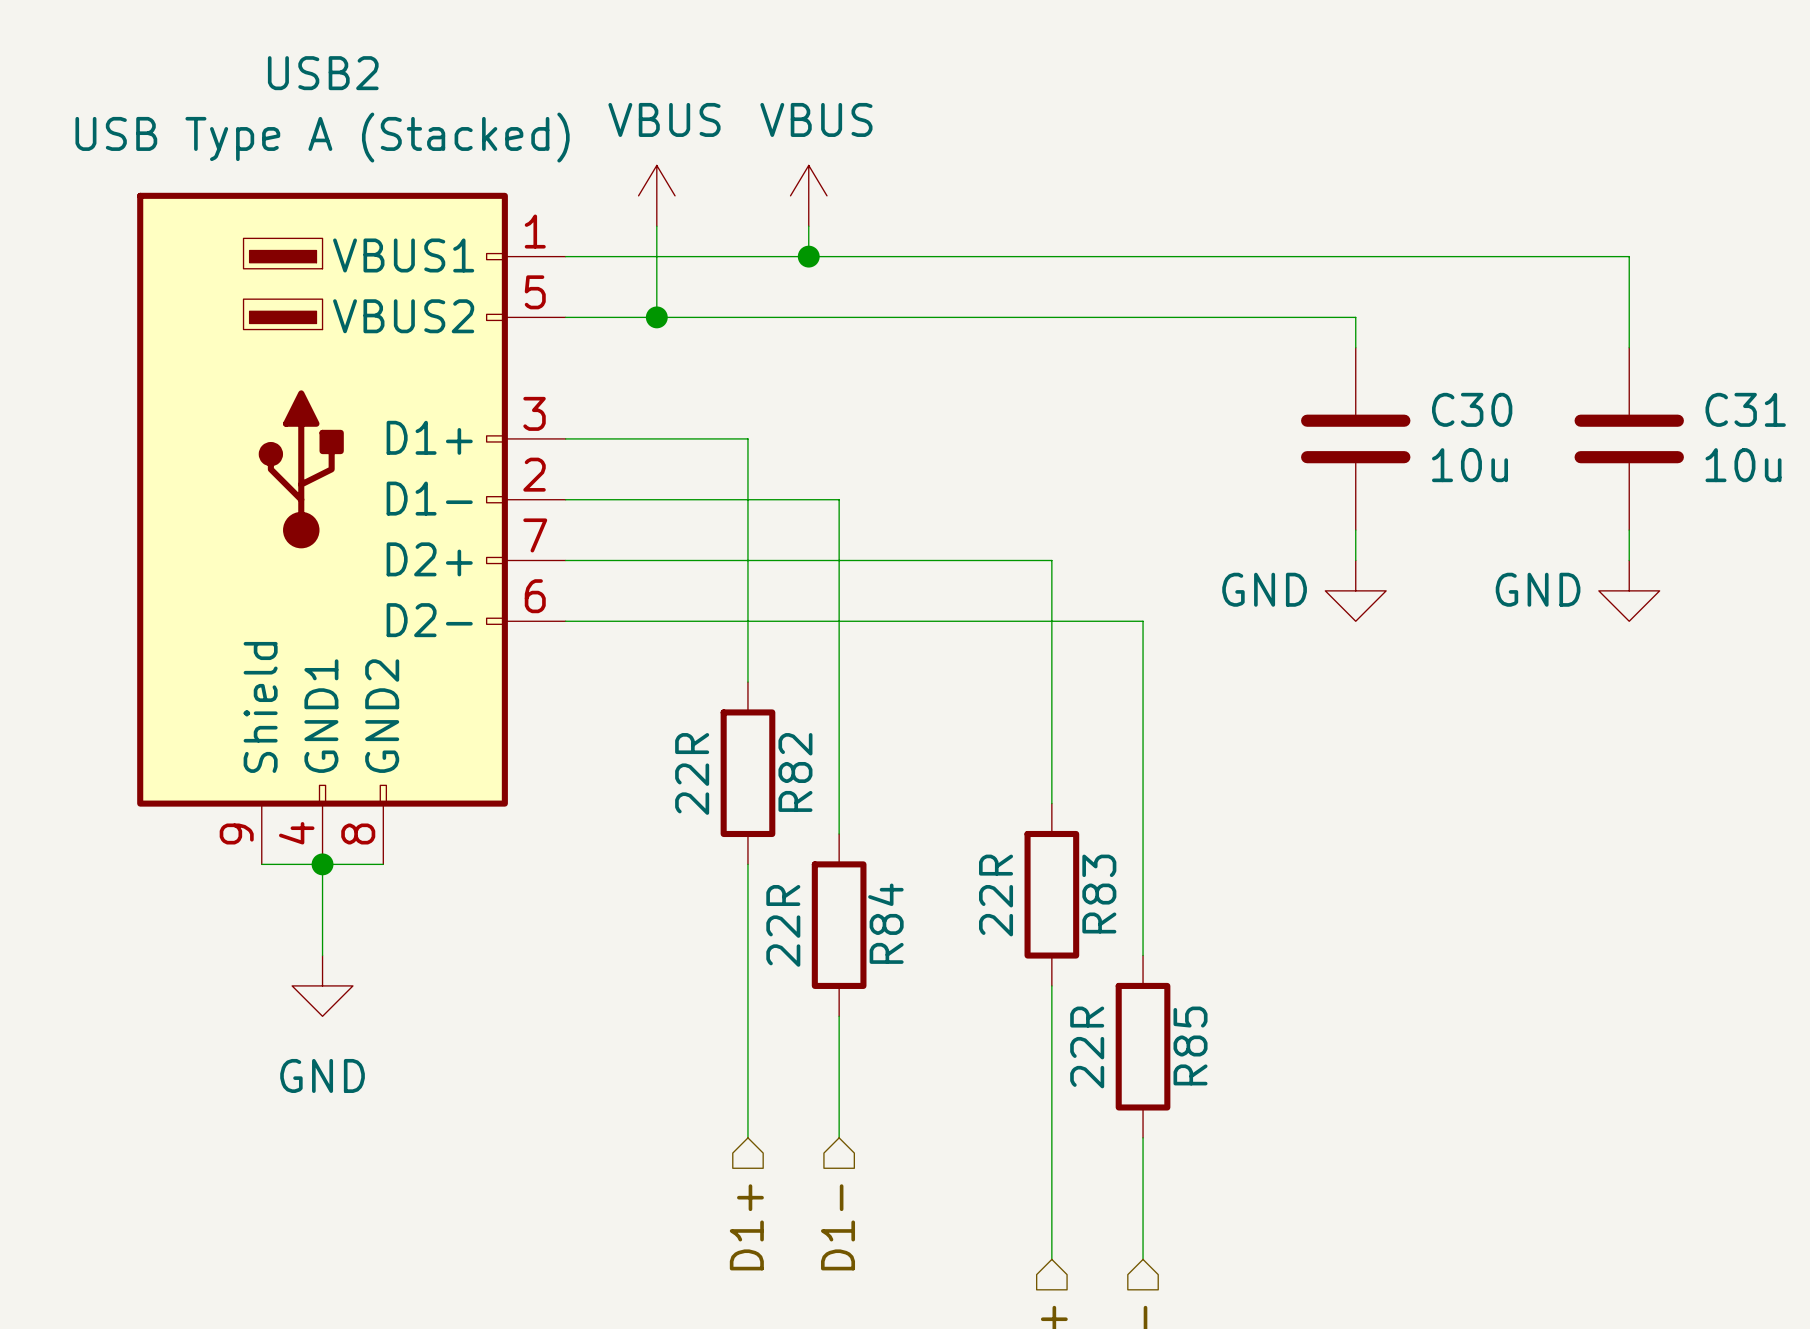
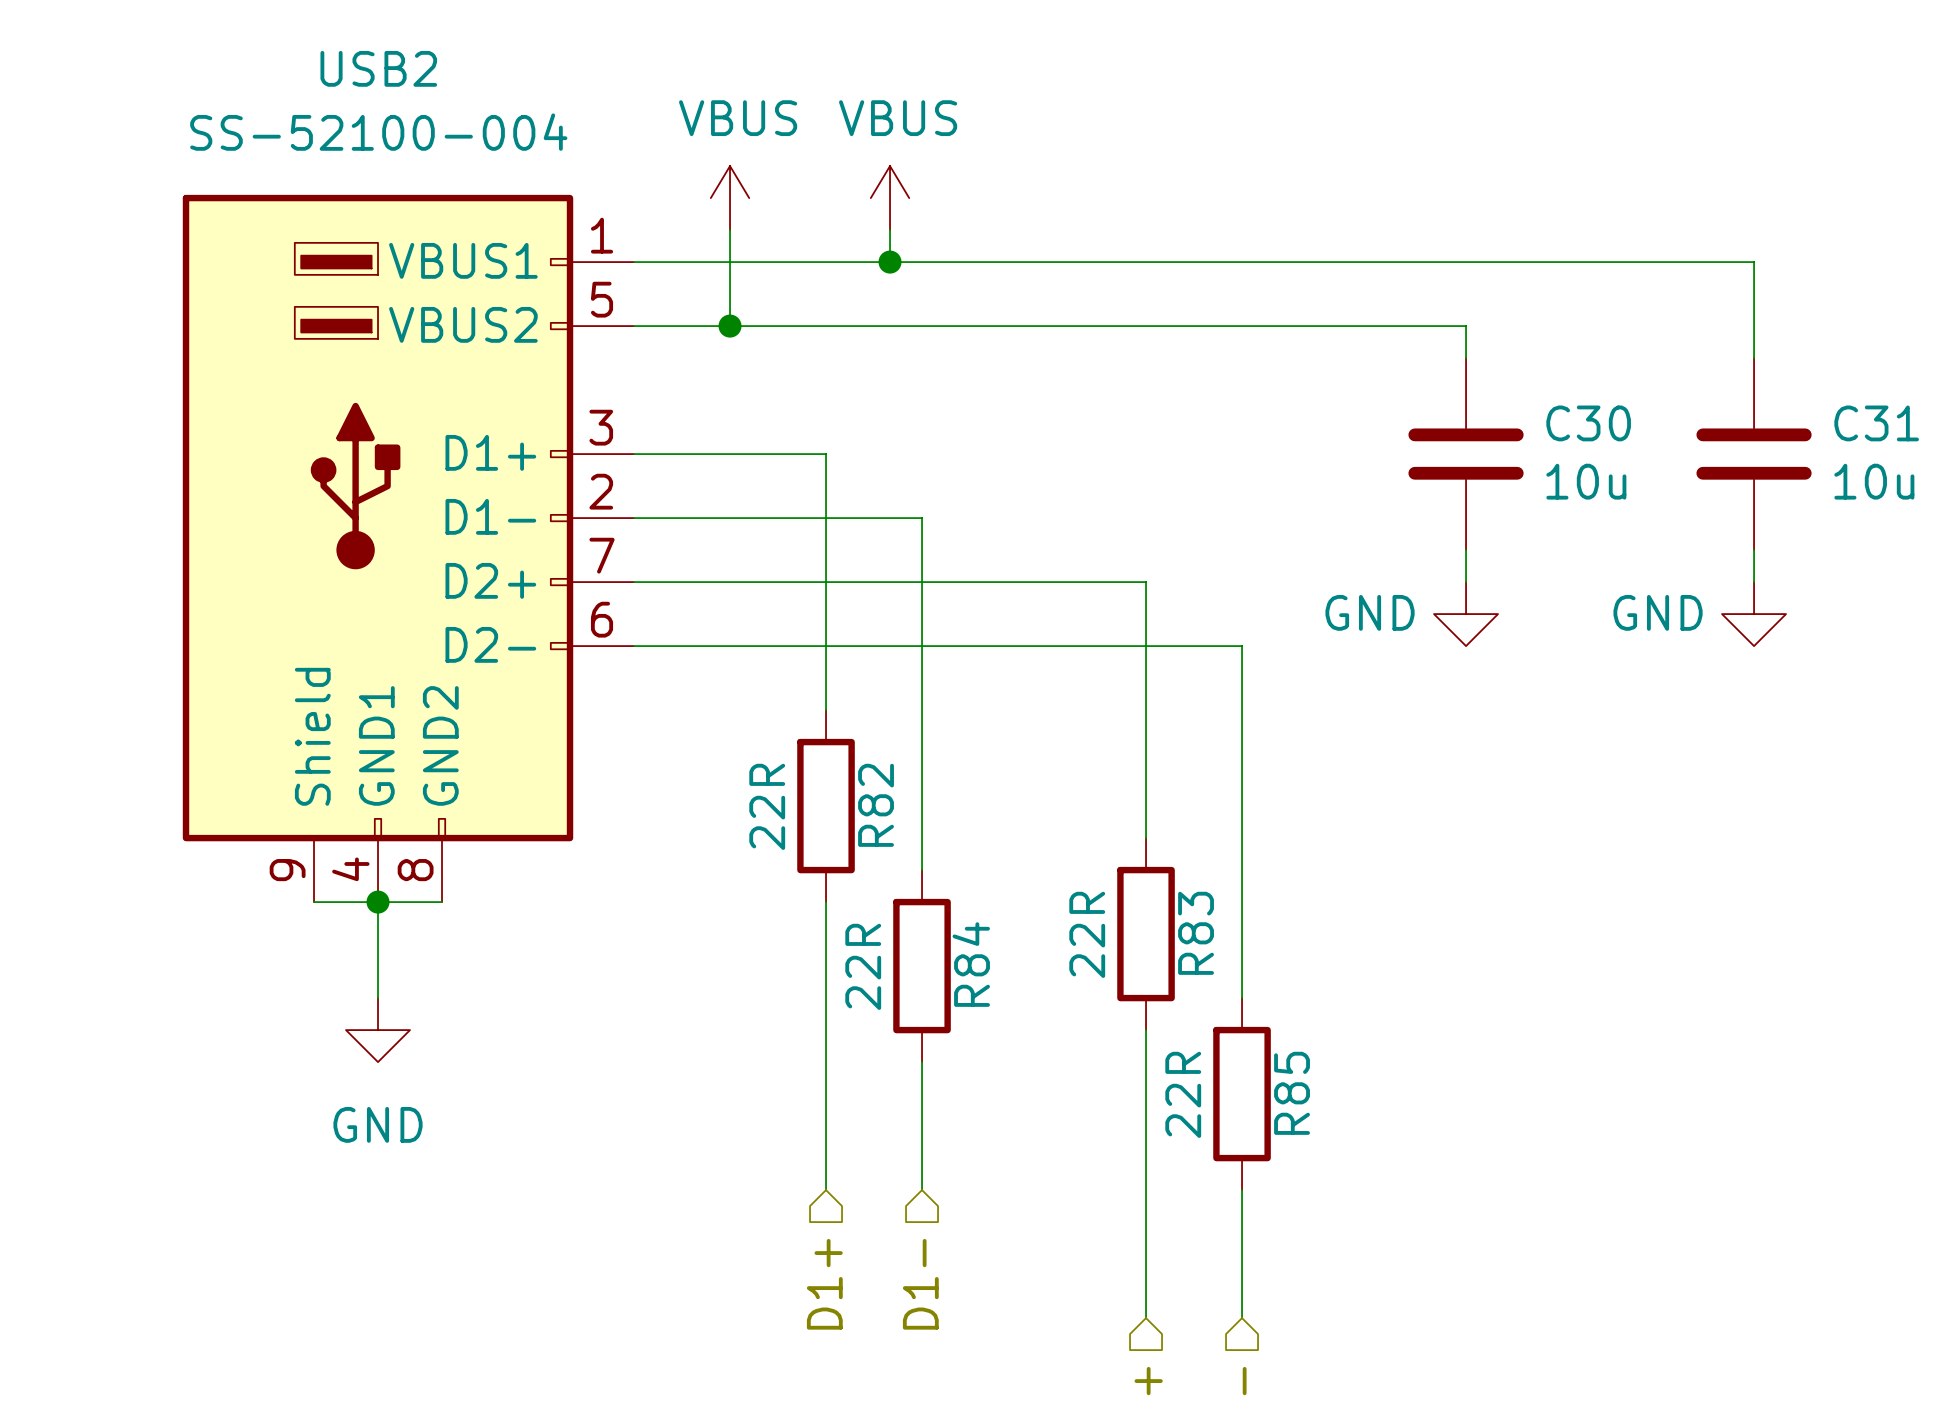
USB2 value: USB Type A (Stacked) (322, 137) -> SS-52100-004 (378, 132)

